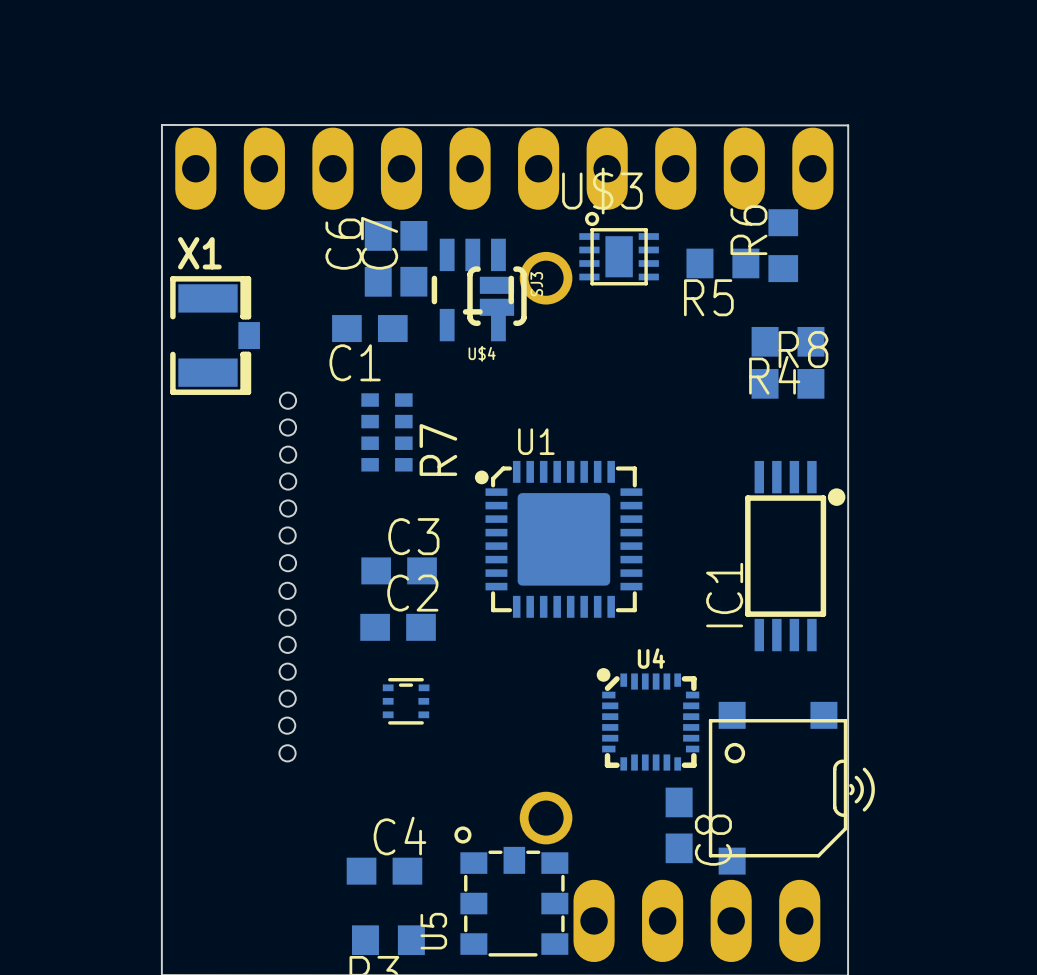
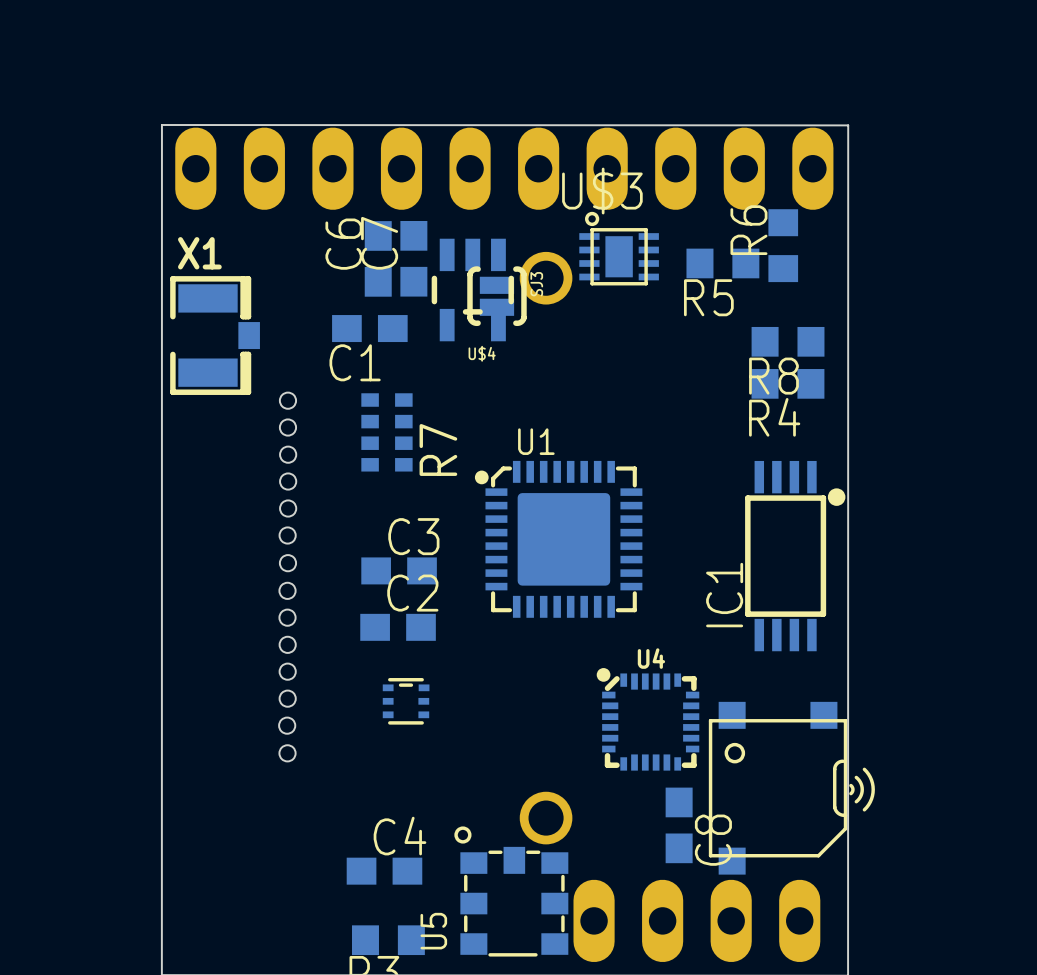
R8 name: R8 (803, 349) -> R4 (774, 417)
R4 name: R4 (774, 375) -> R8 (773, 376)

